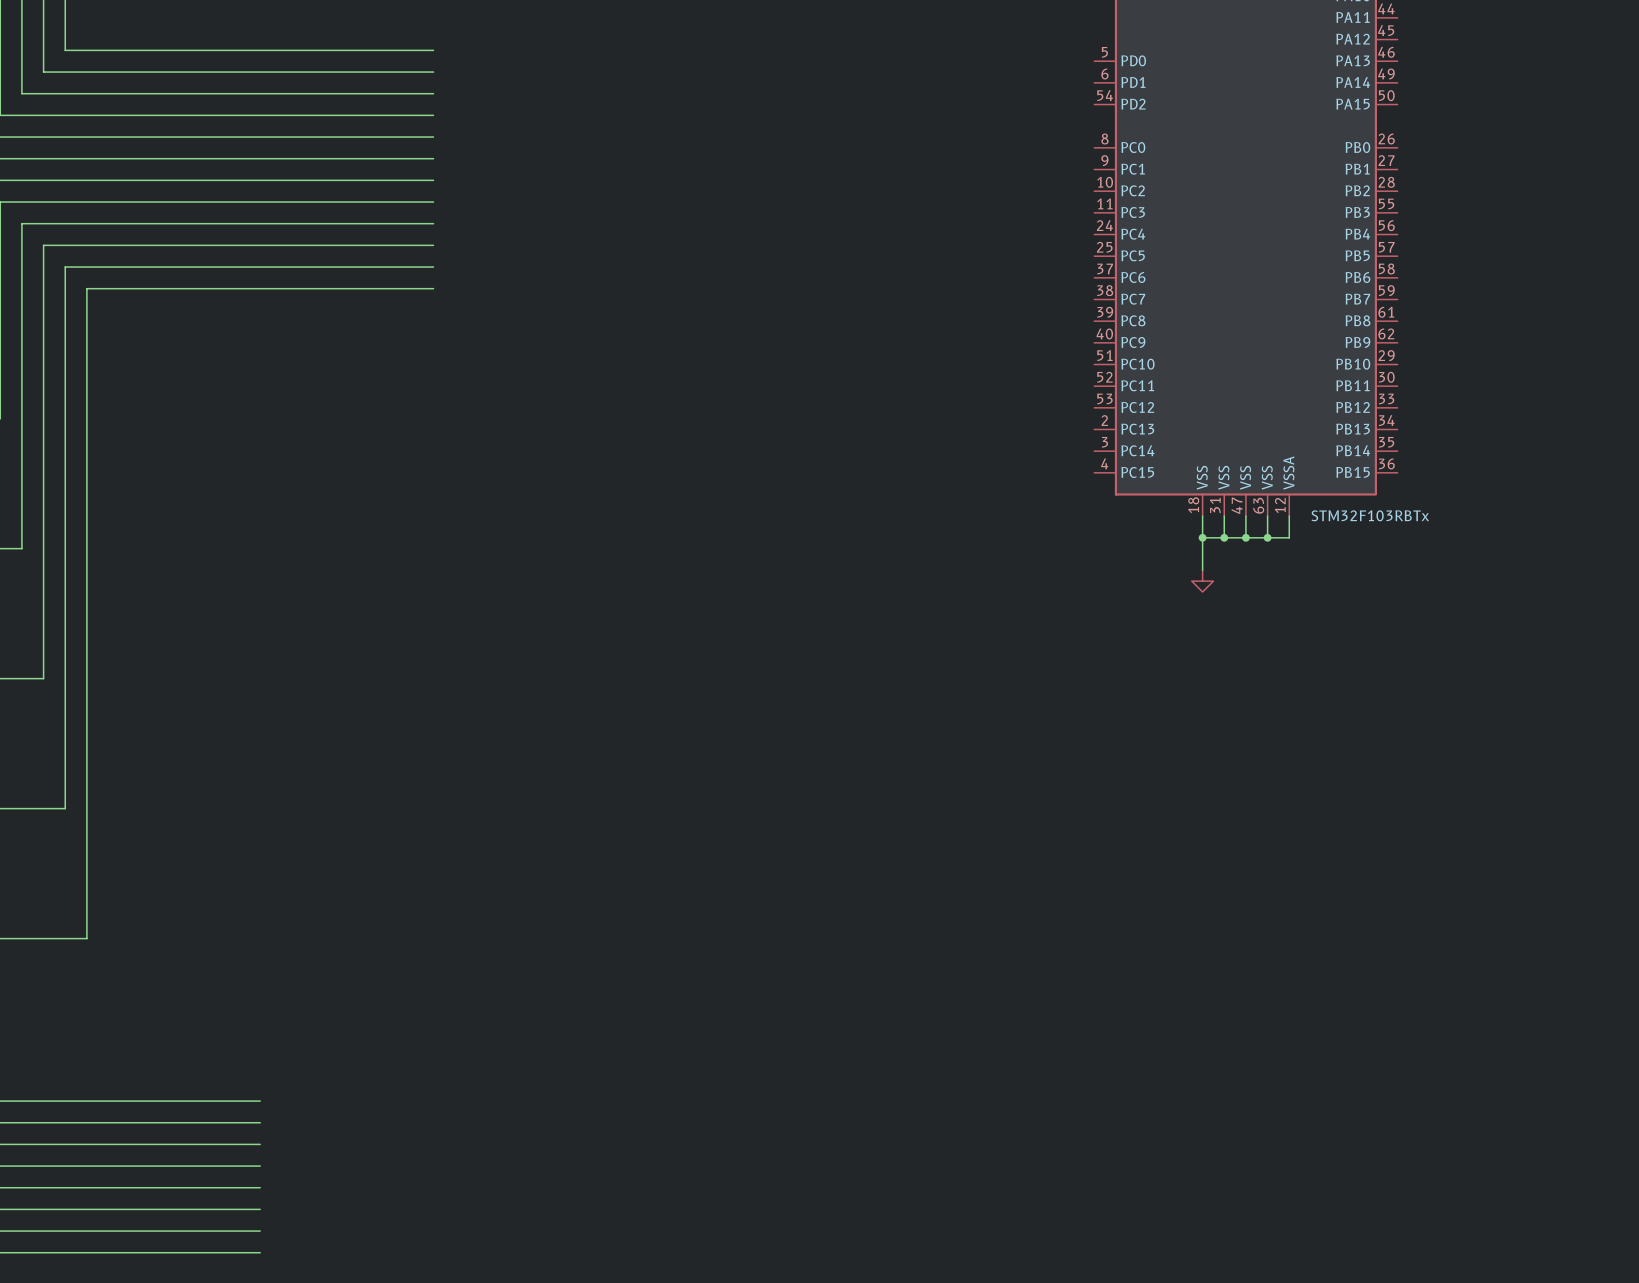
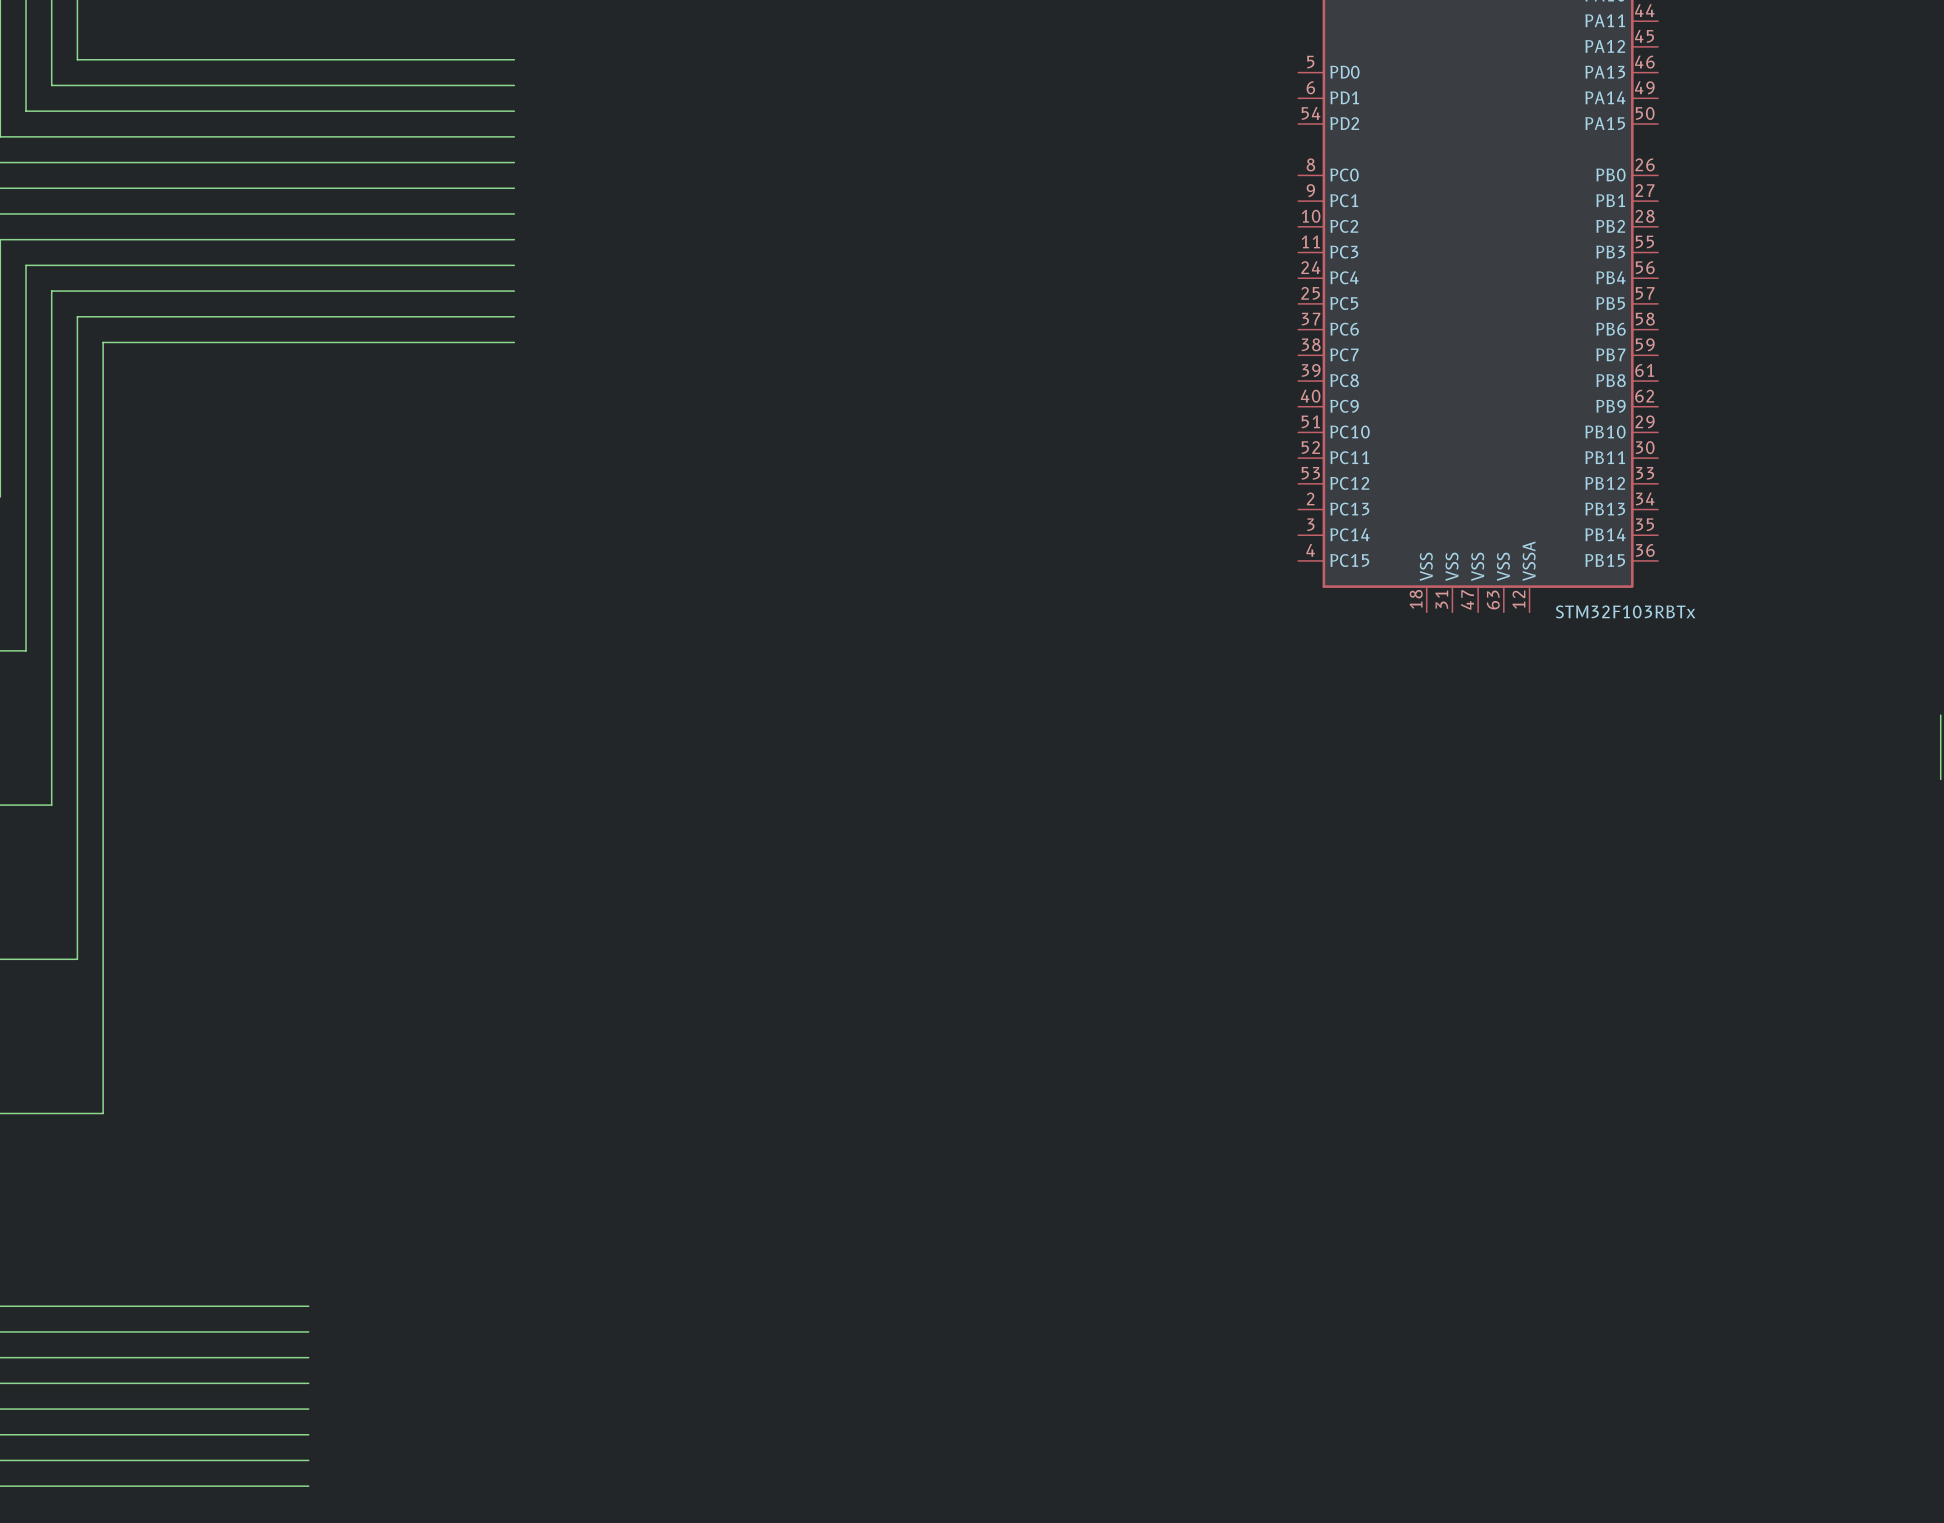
wire: (1202, 516) (1202, 570) -> none
wire: (1224, 516) (1224, 537) -> none
wire: (1245, 516) (1245, 537) -> none
wire: (1267, 516) (1267, 537) -> none
wire: (1289, 516) (1289, 537) (1202, 537) -> none
junction: (1202, 537) -> none
junction: (1224, 537) -> none
junction: (1245, 537) -> none
junction: (1267, 537) -> none
power symbol: (1202, 581) -> none
wire: none -> (1940, 715) (1940, 779)

